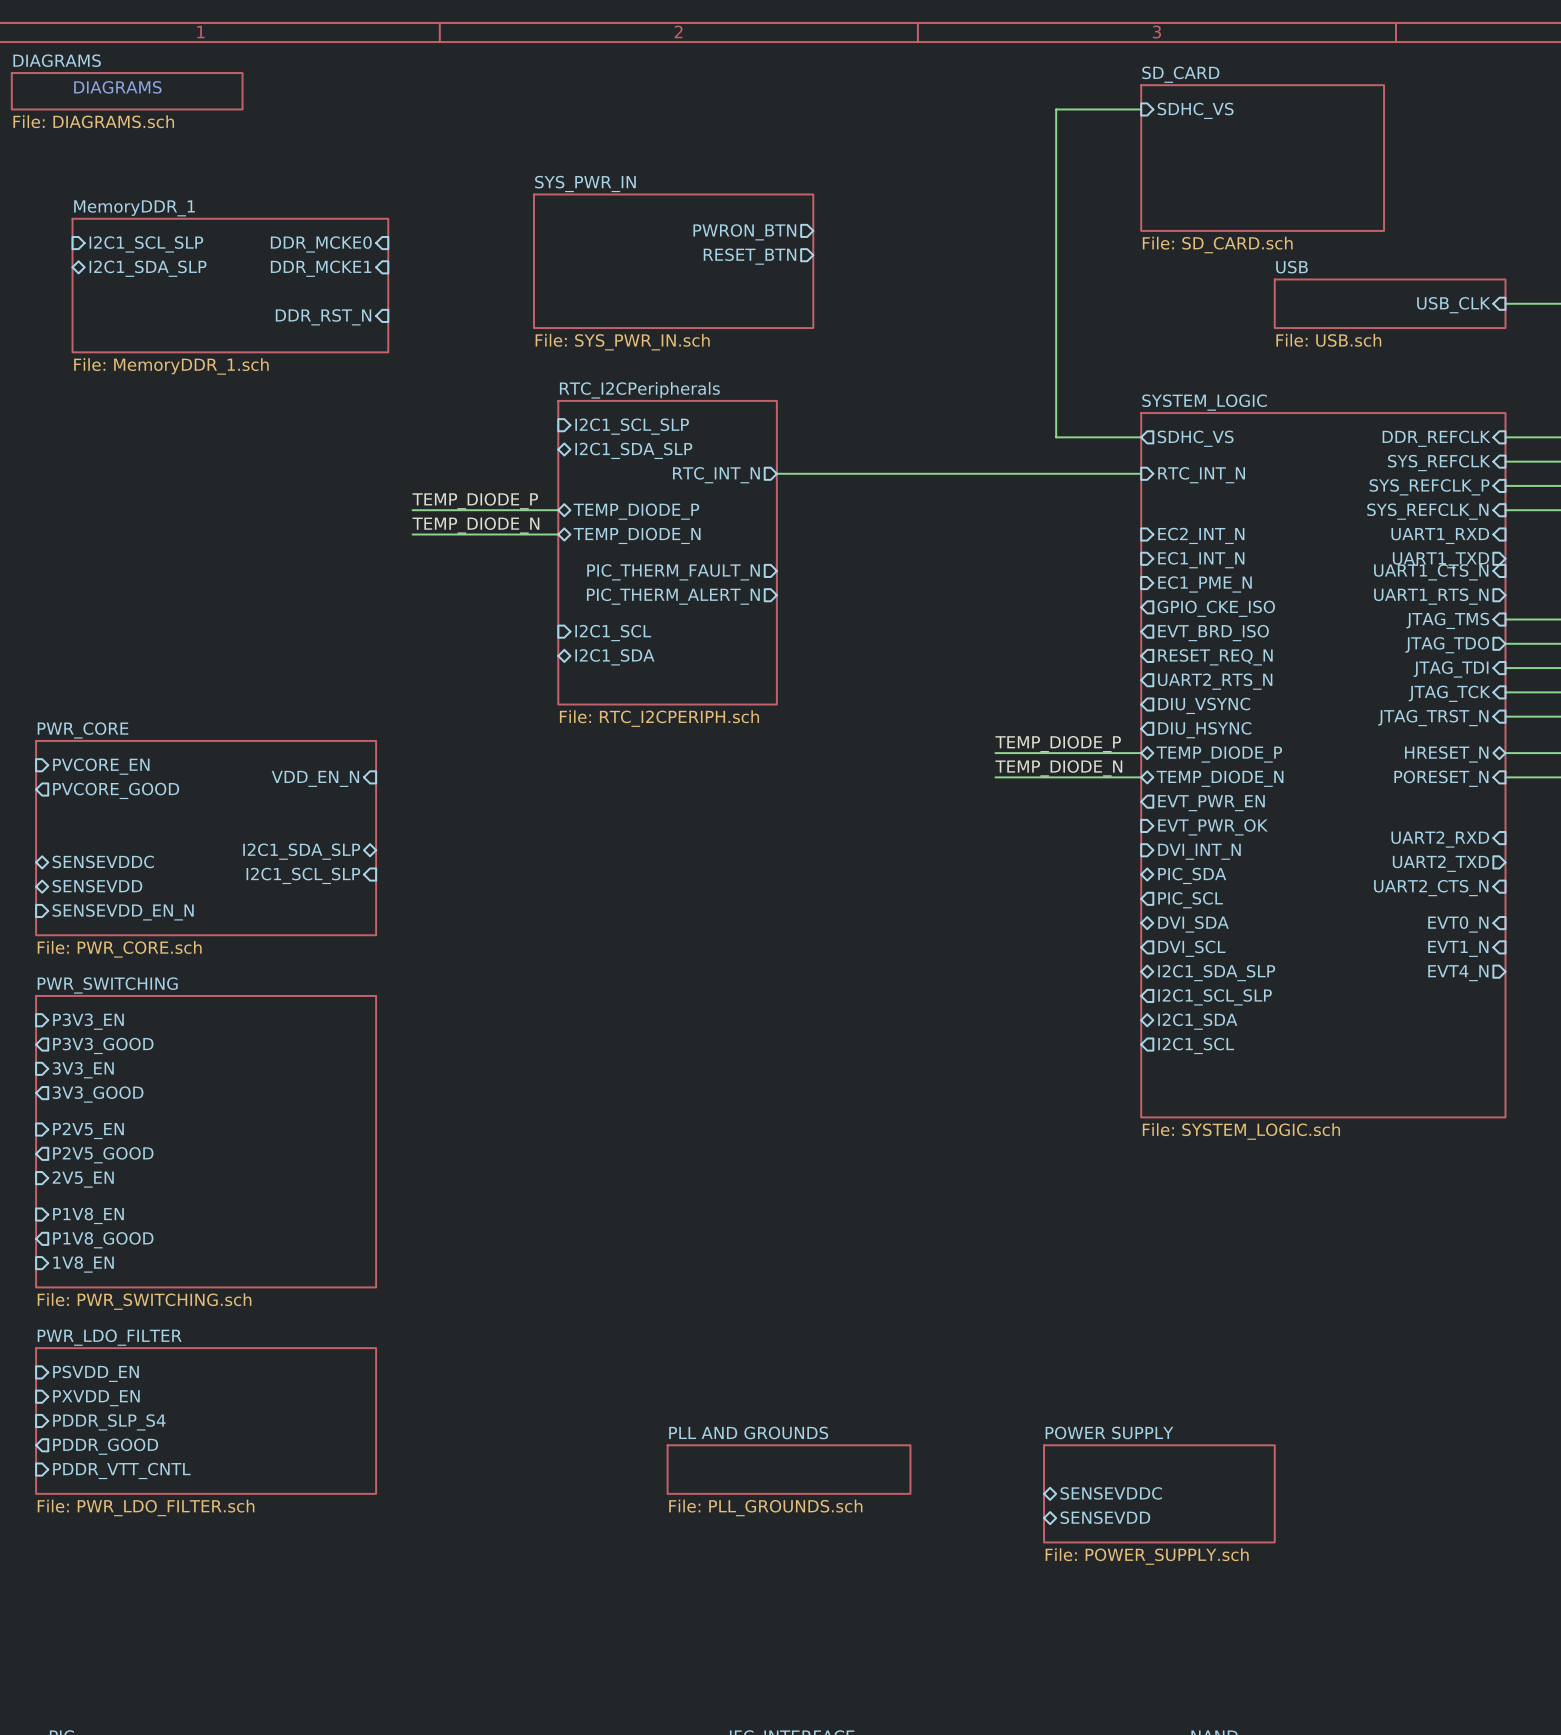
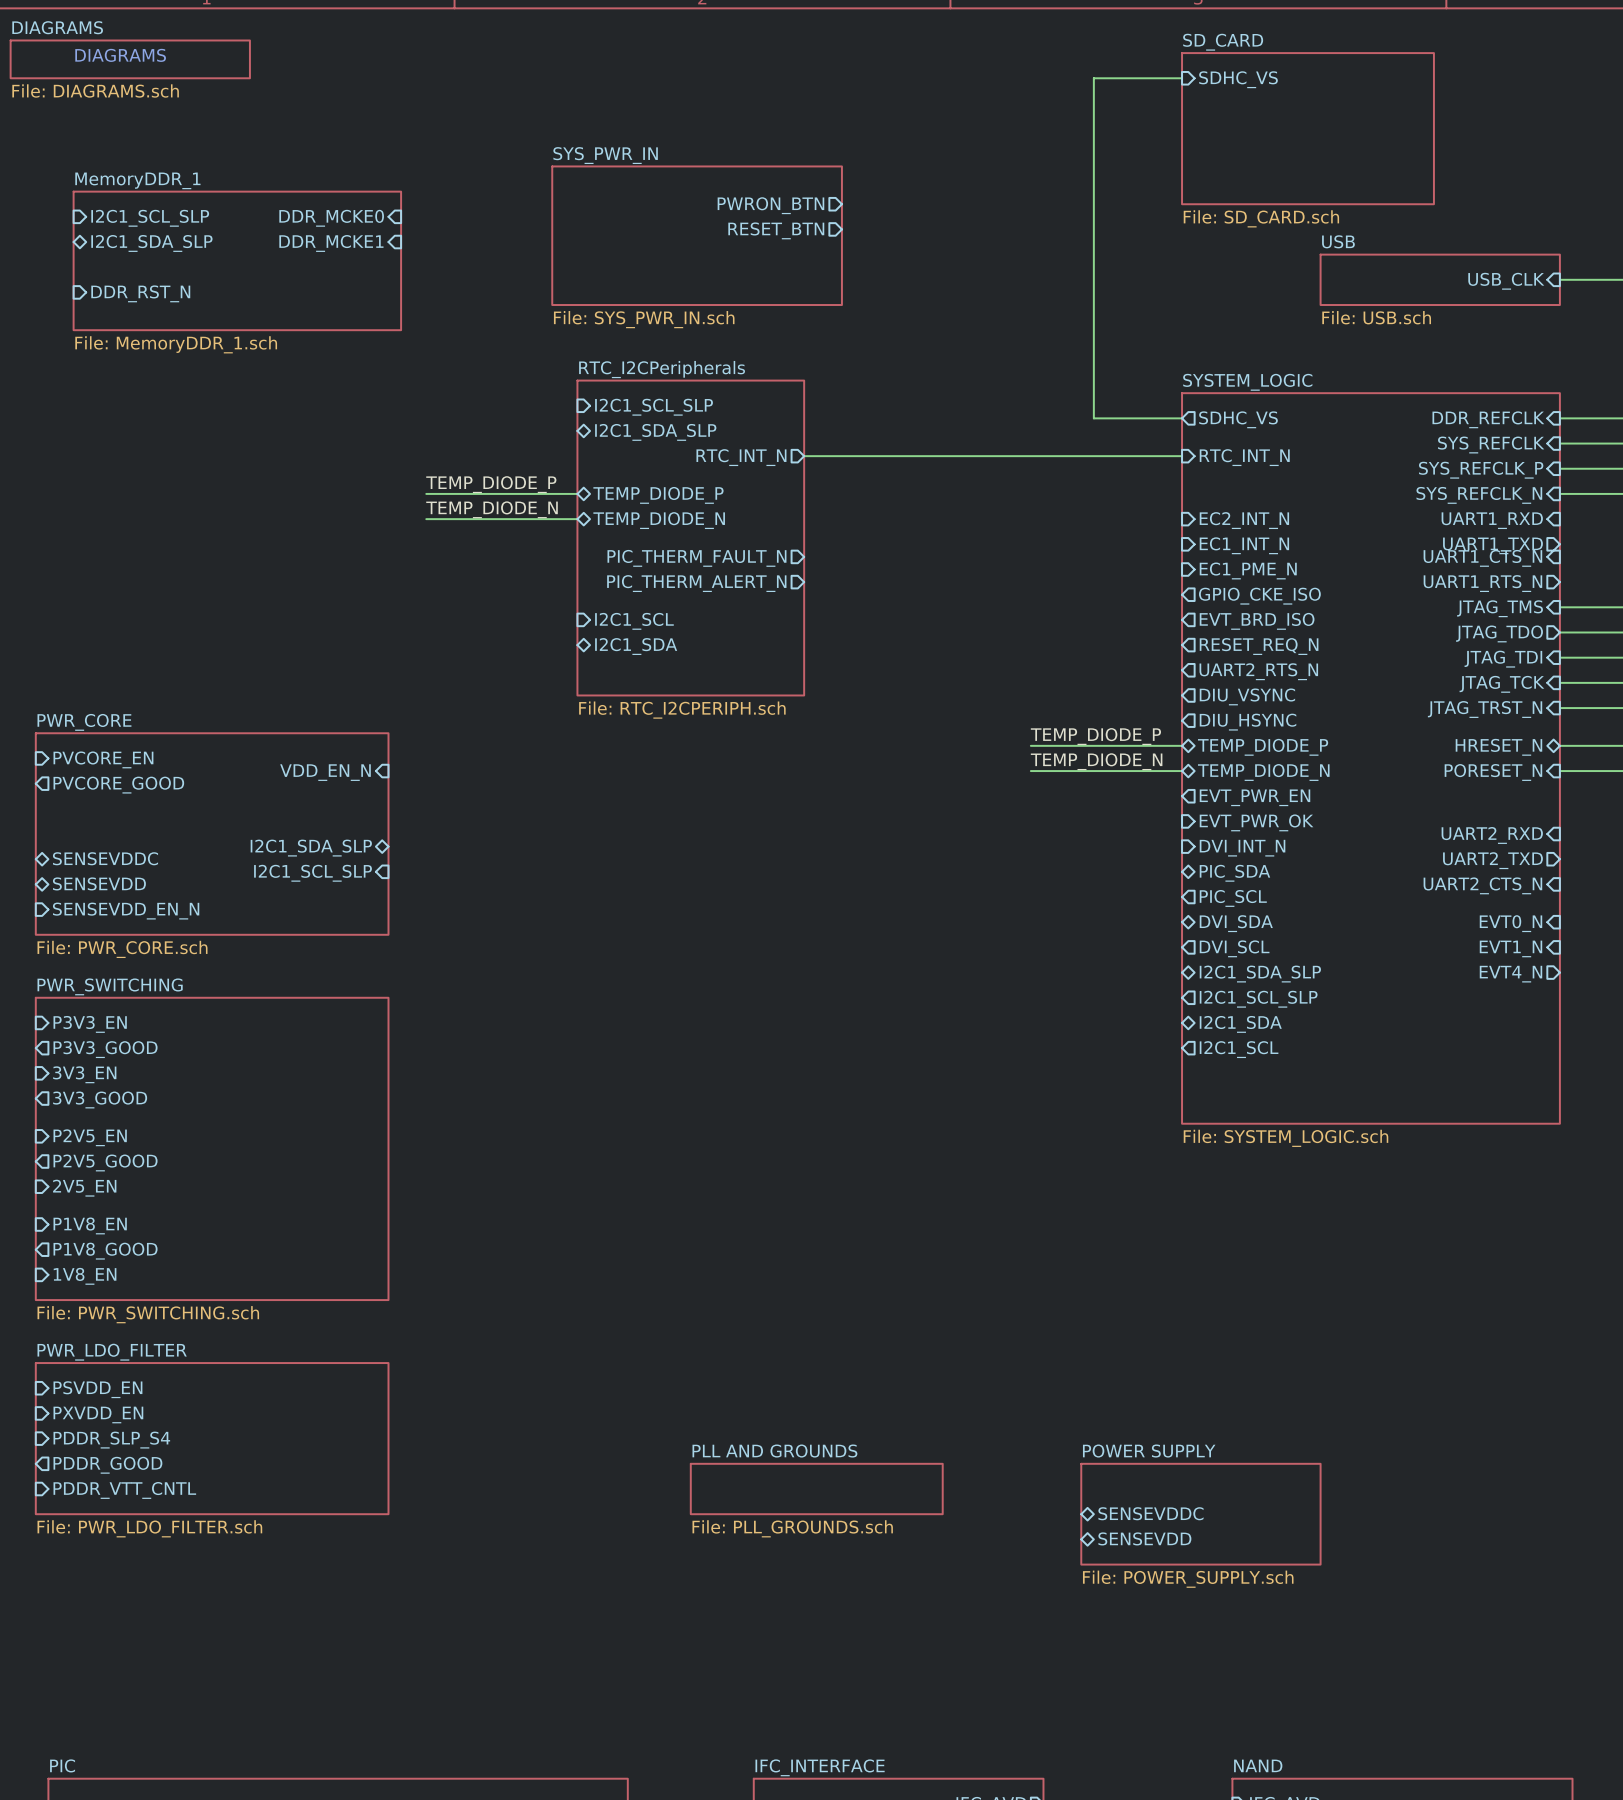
sheet pin: none -> DDR_RST_N (140, 293)
sheet pin: DDR_RST_N (323, 317) -> none

